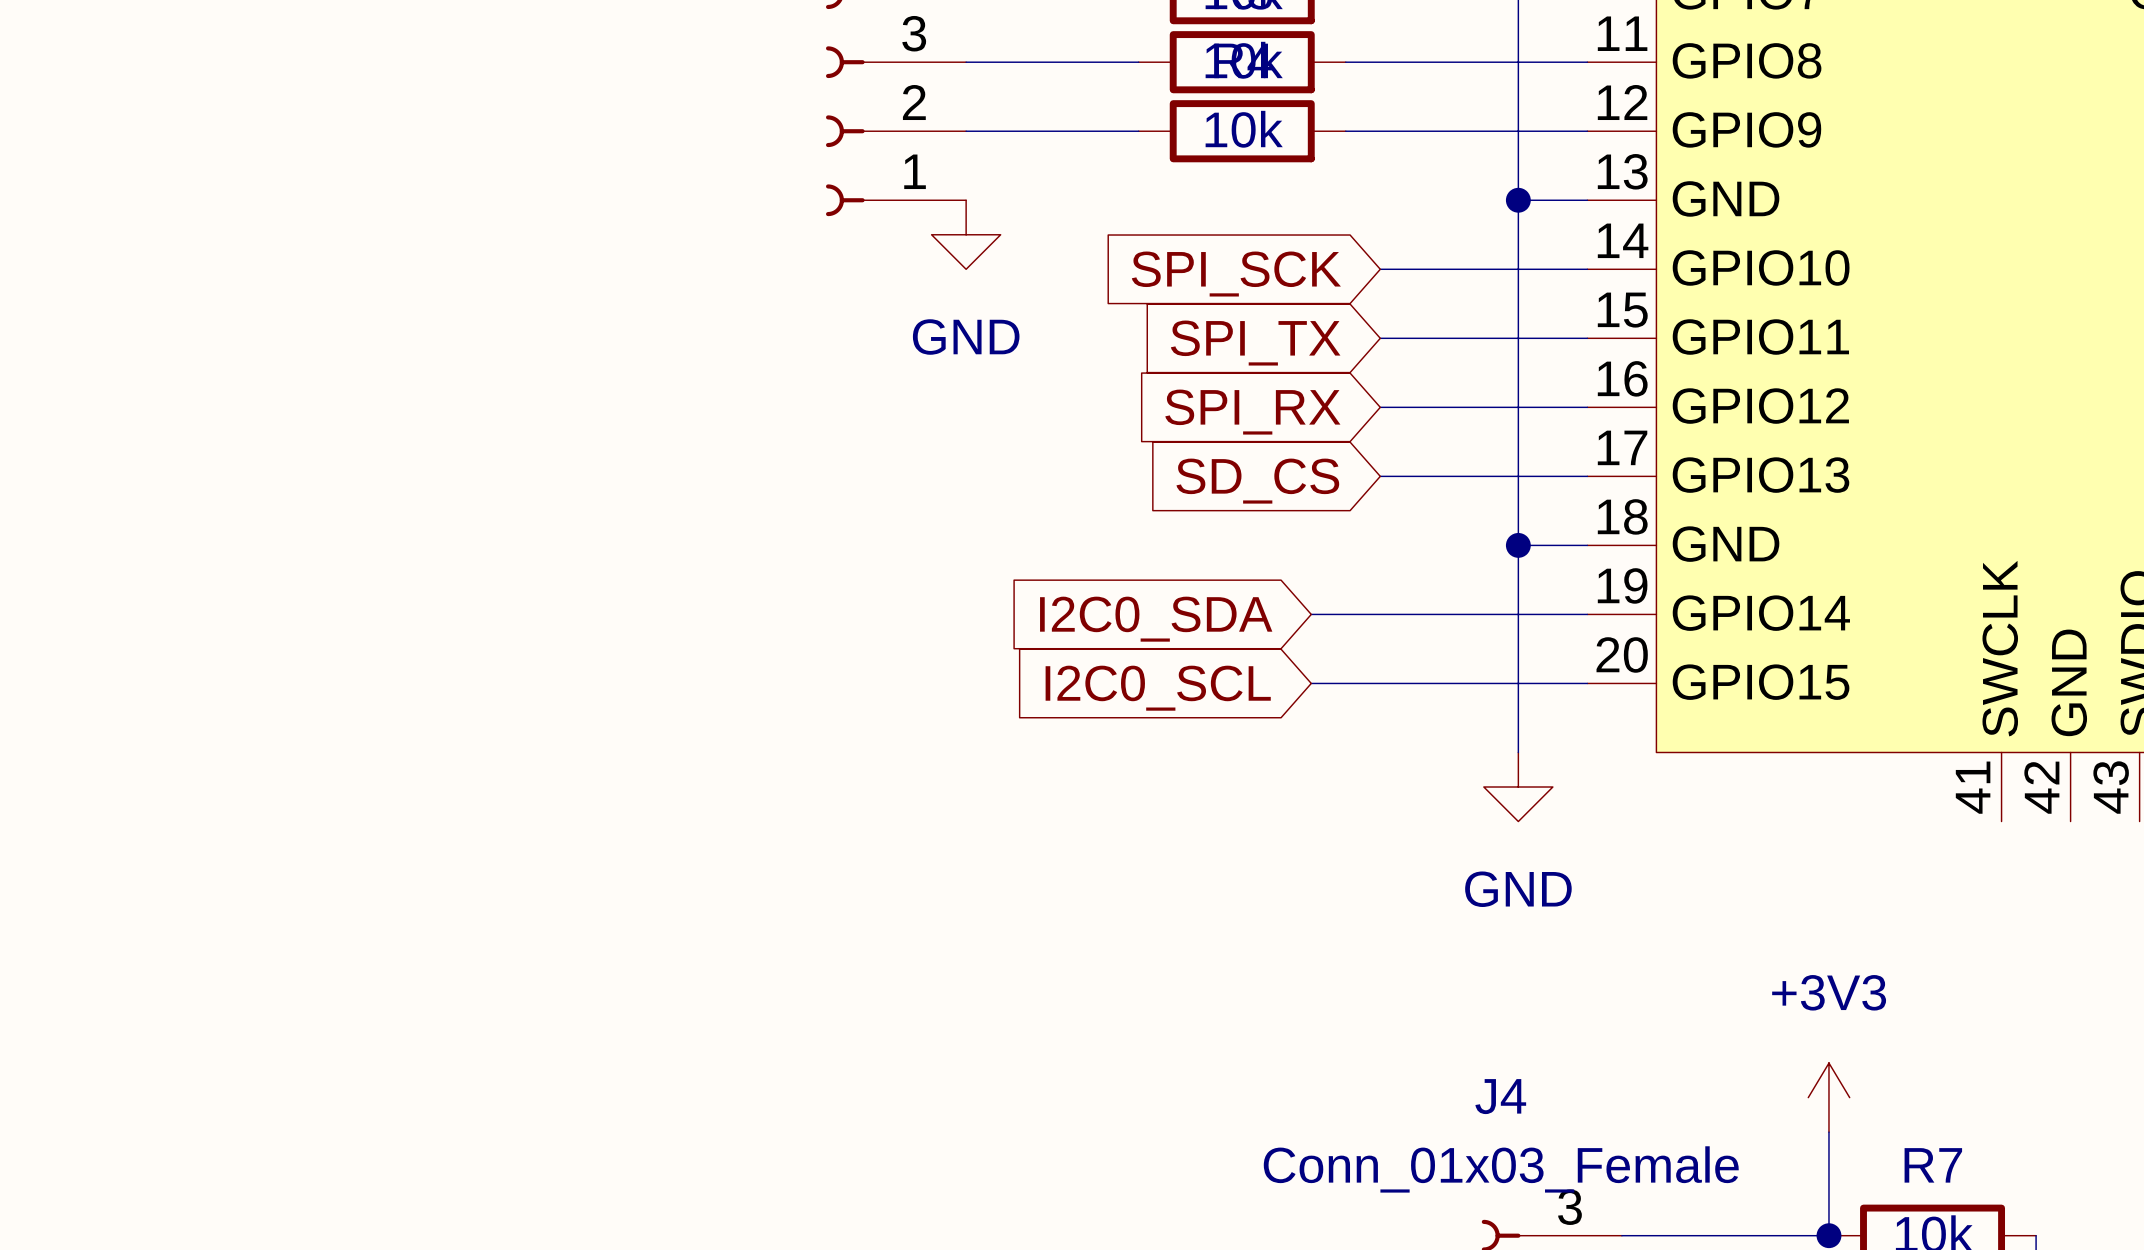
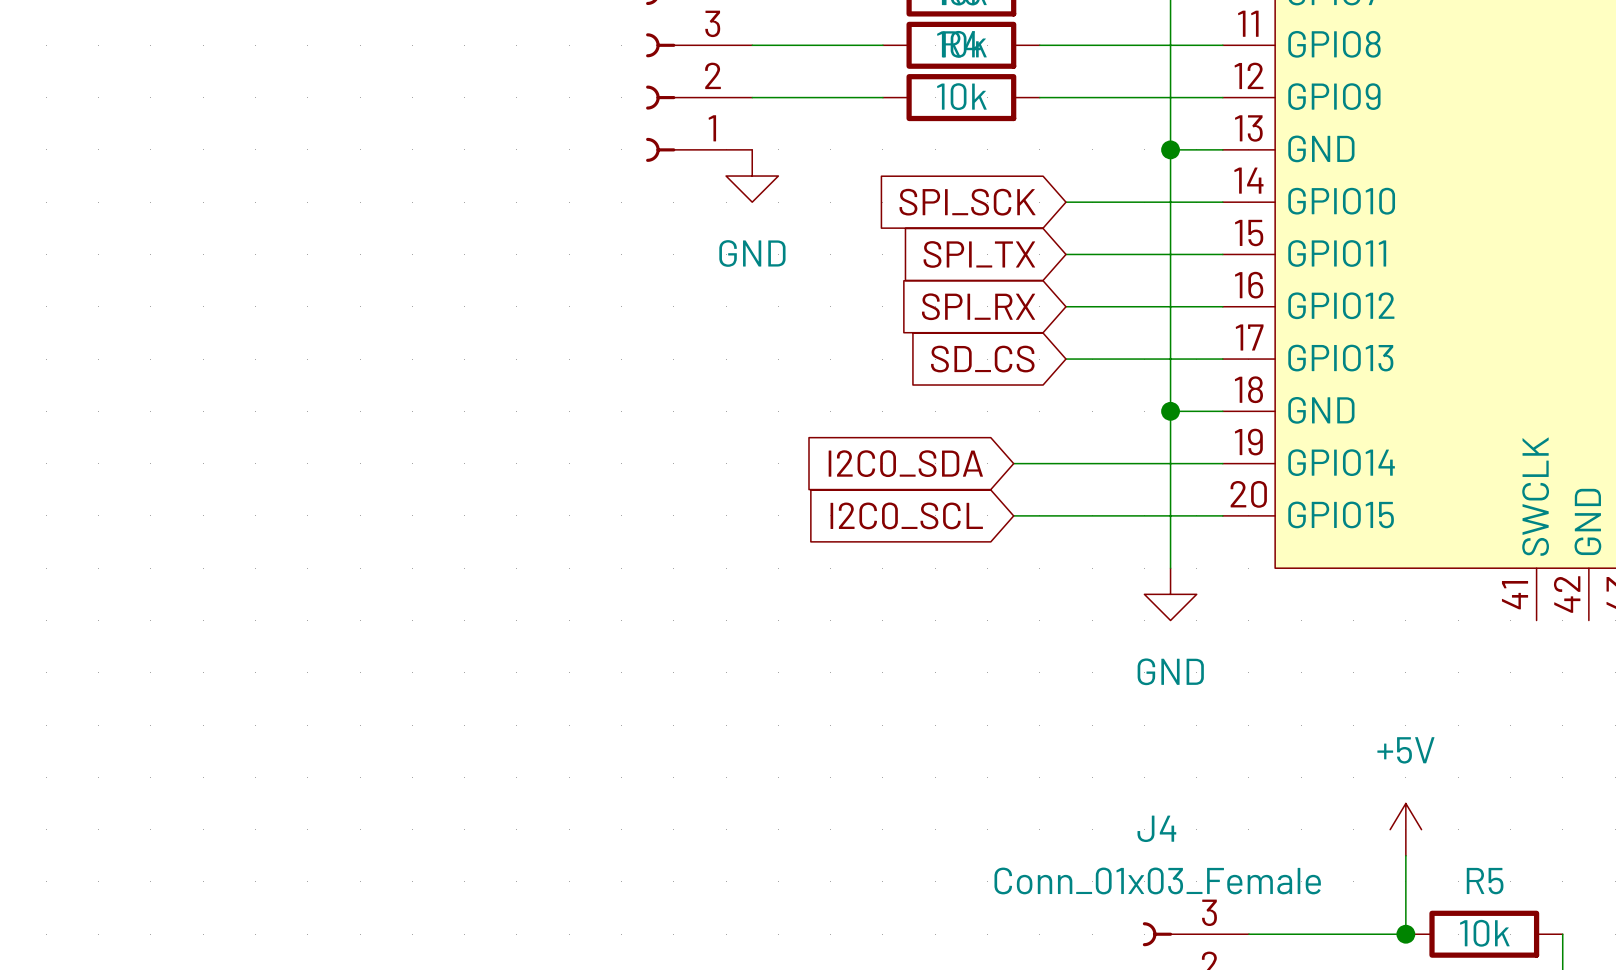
power symbol: +3V3 (1828, 1097) -> +5V (1405, 829)
R7 name: R7 (1933, 1165) -> R5 (1485, 881)

